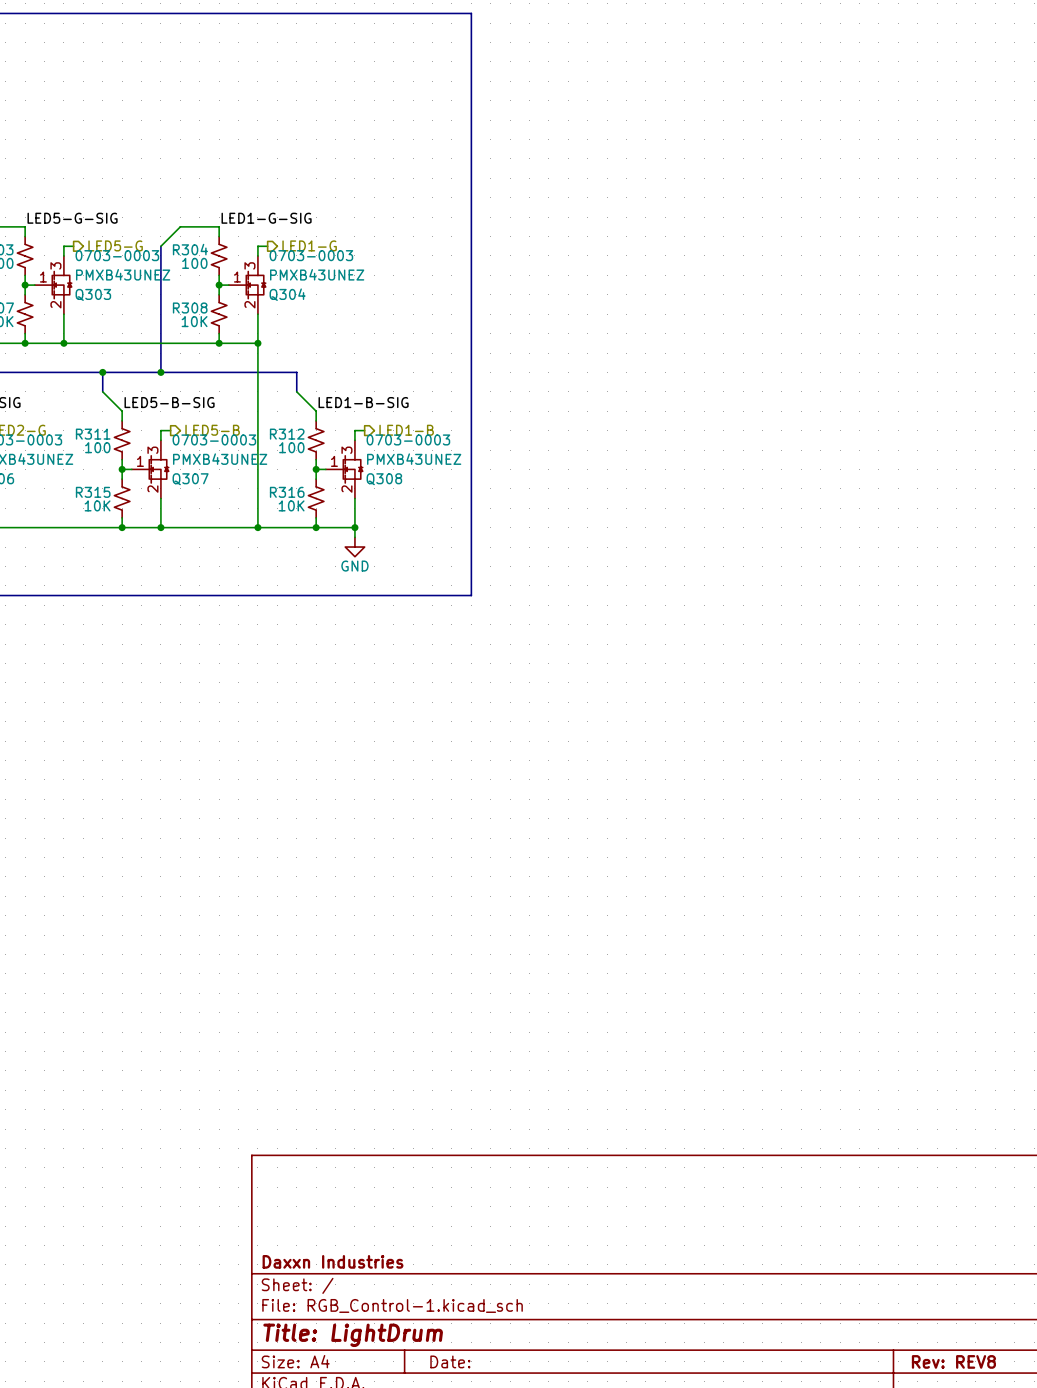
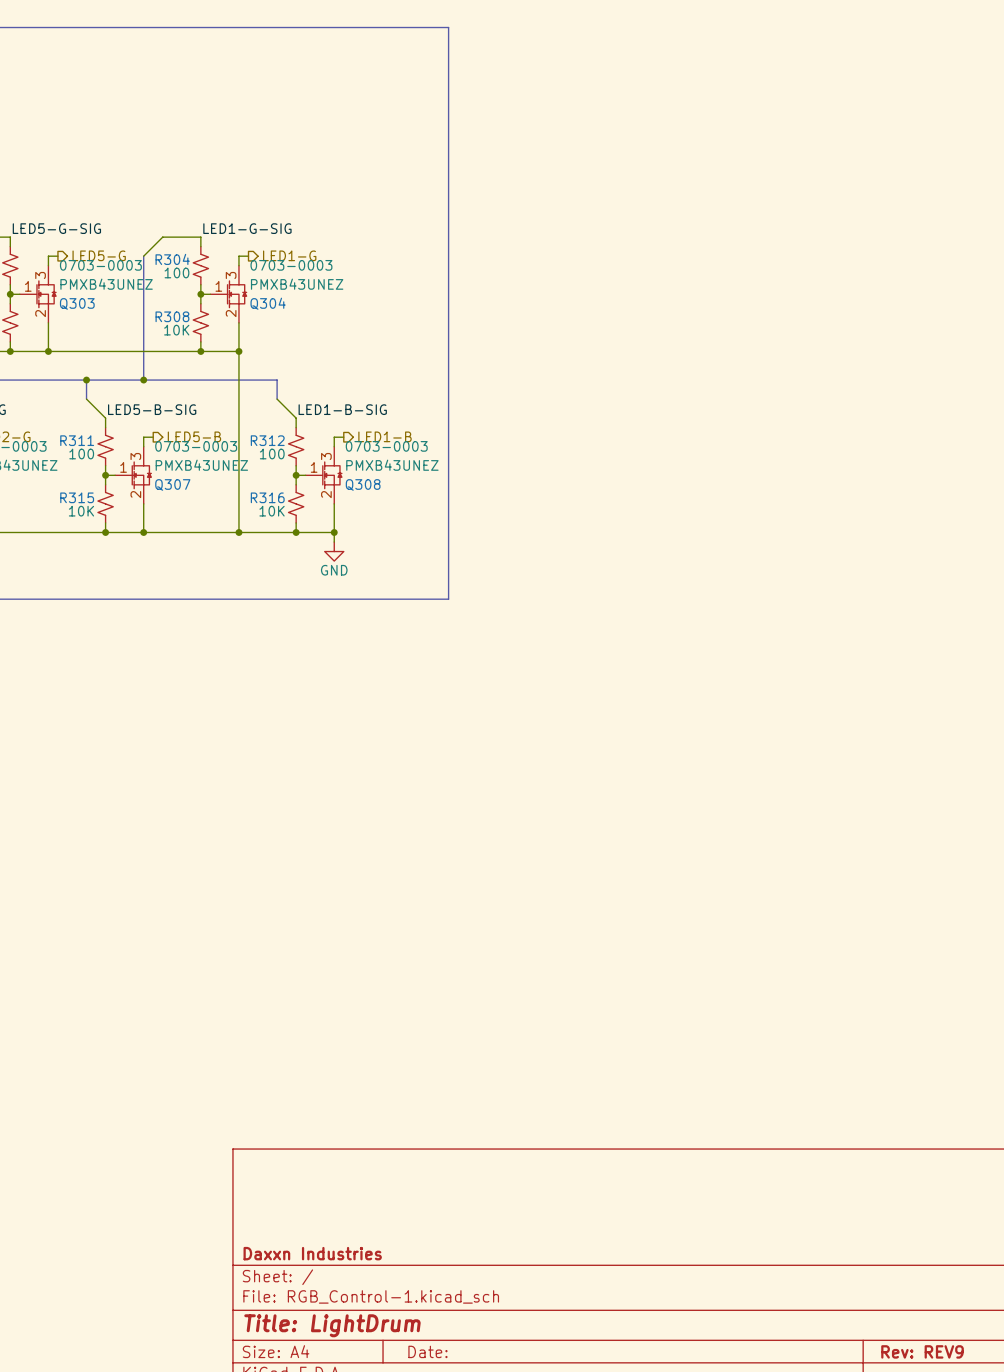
title block: Rev: REV8 (953, 1361) -> Rev: REV9 (922, 1351)

